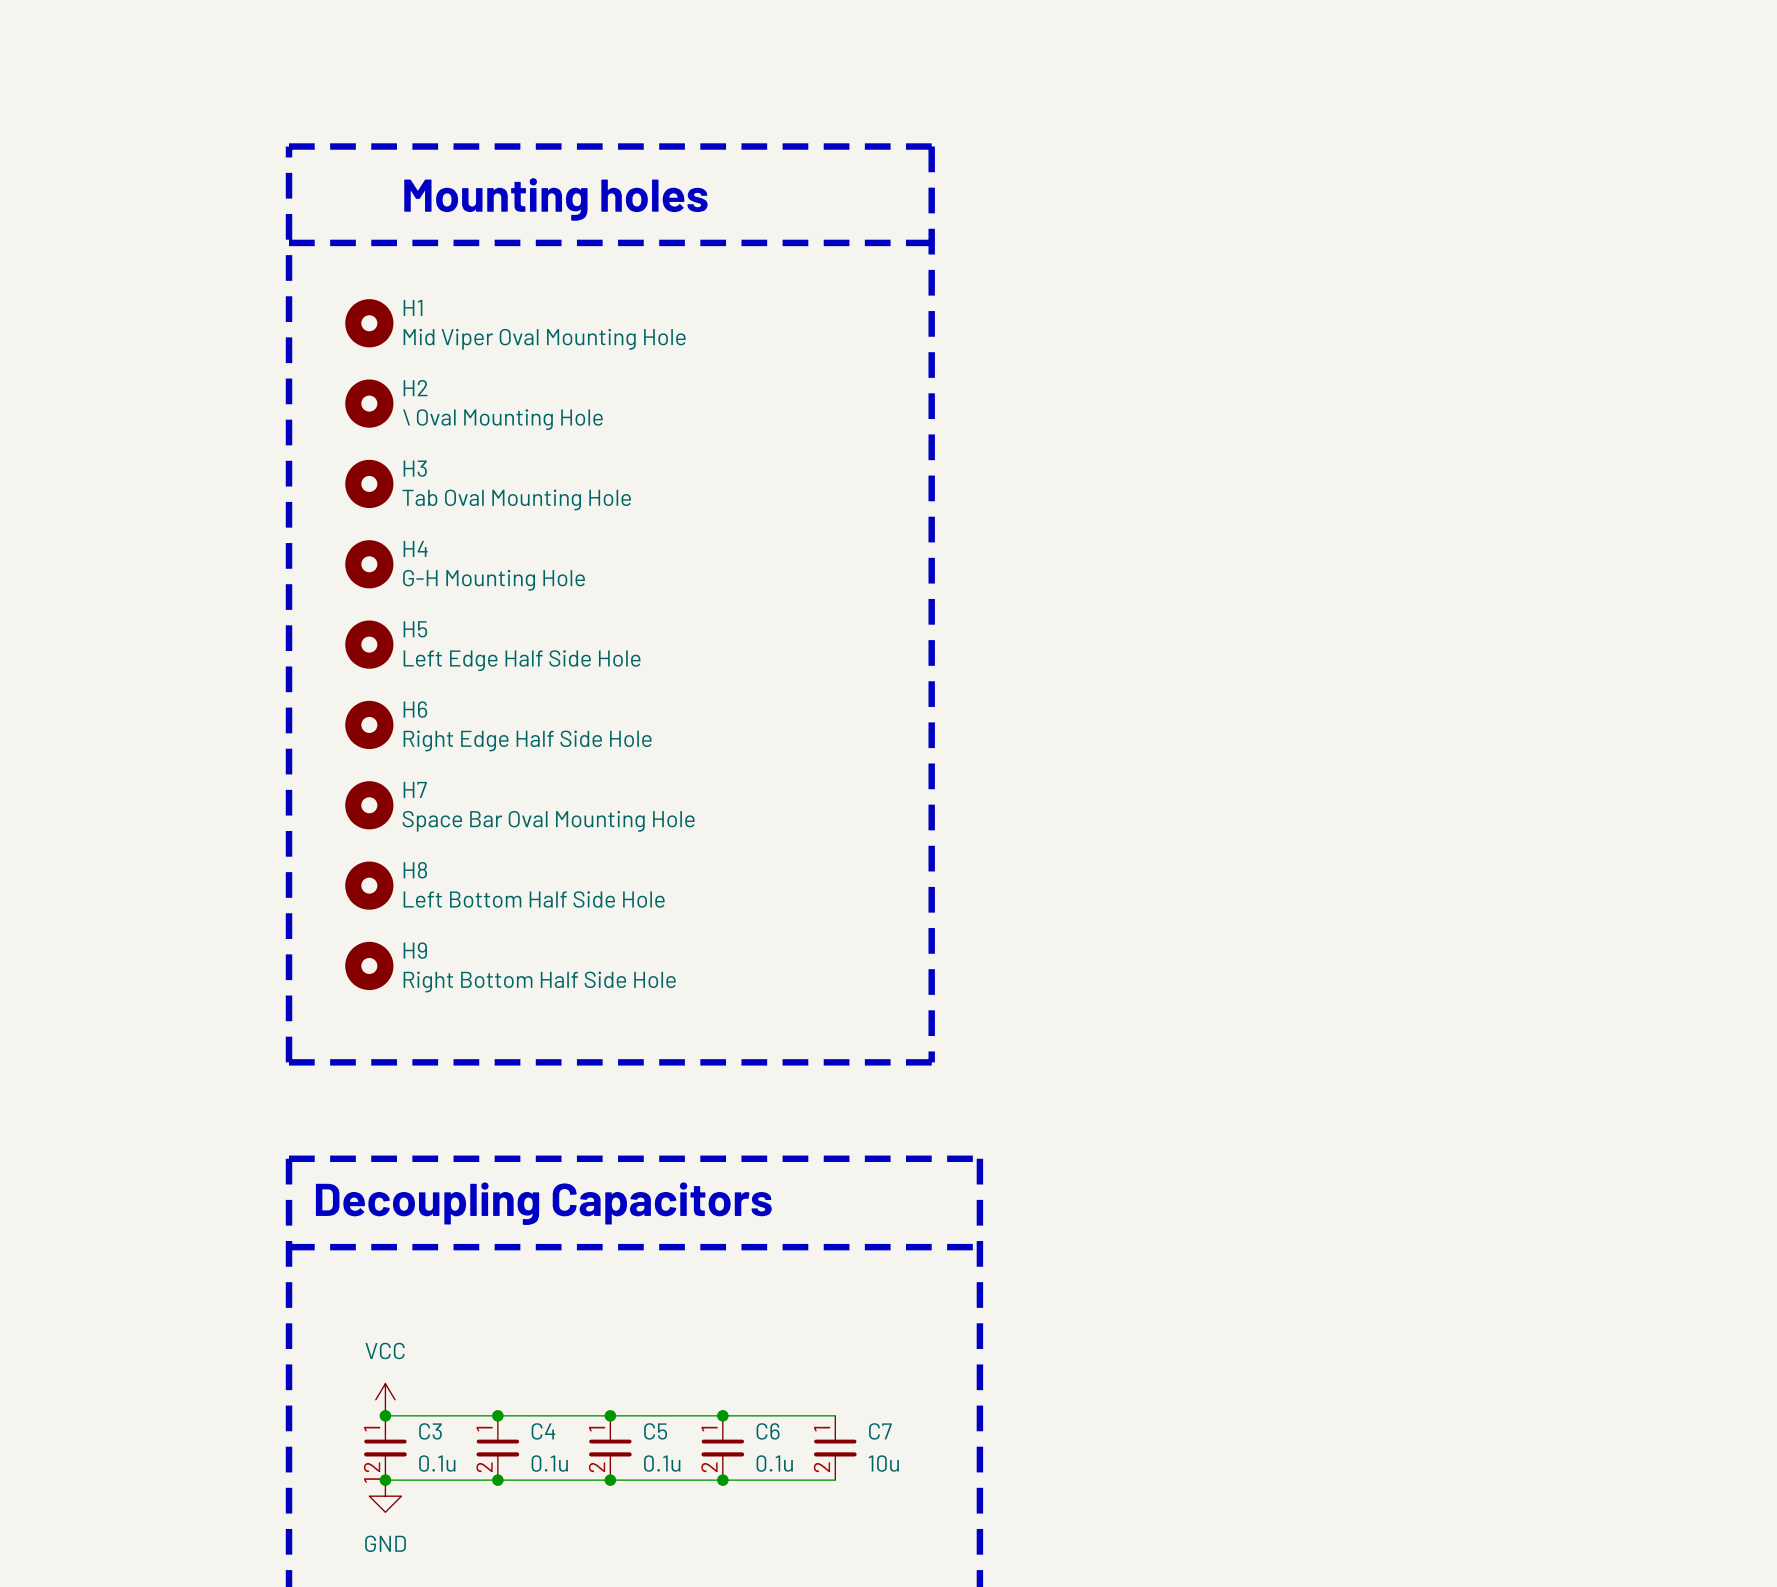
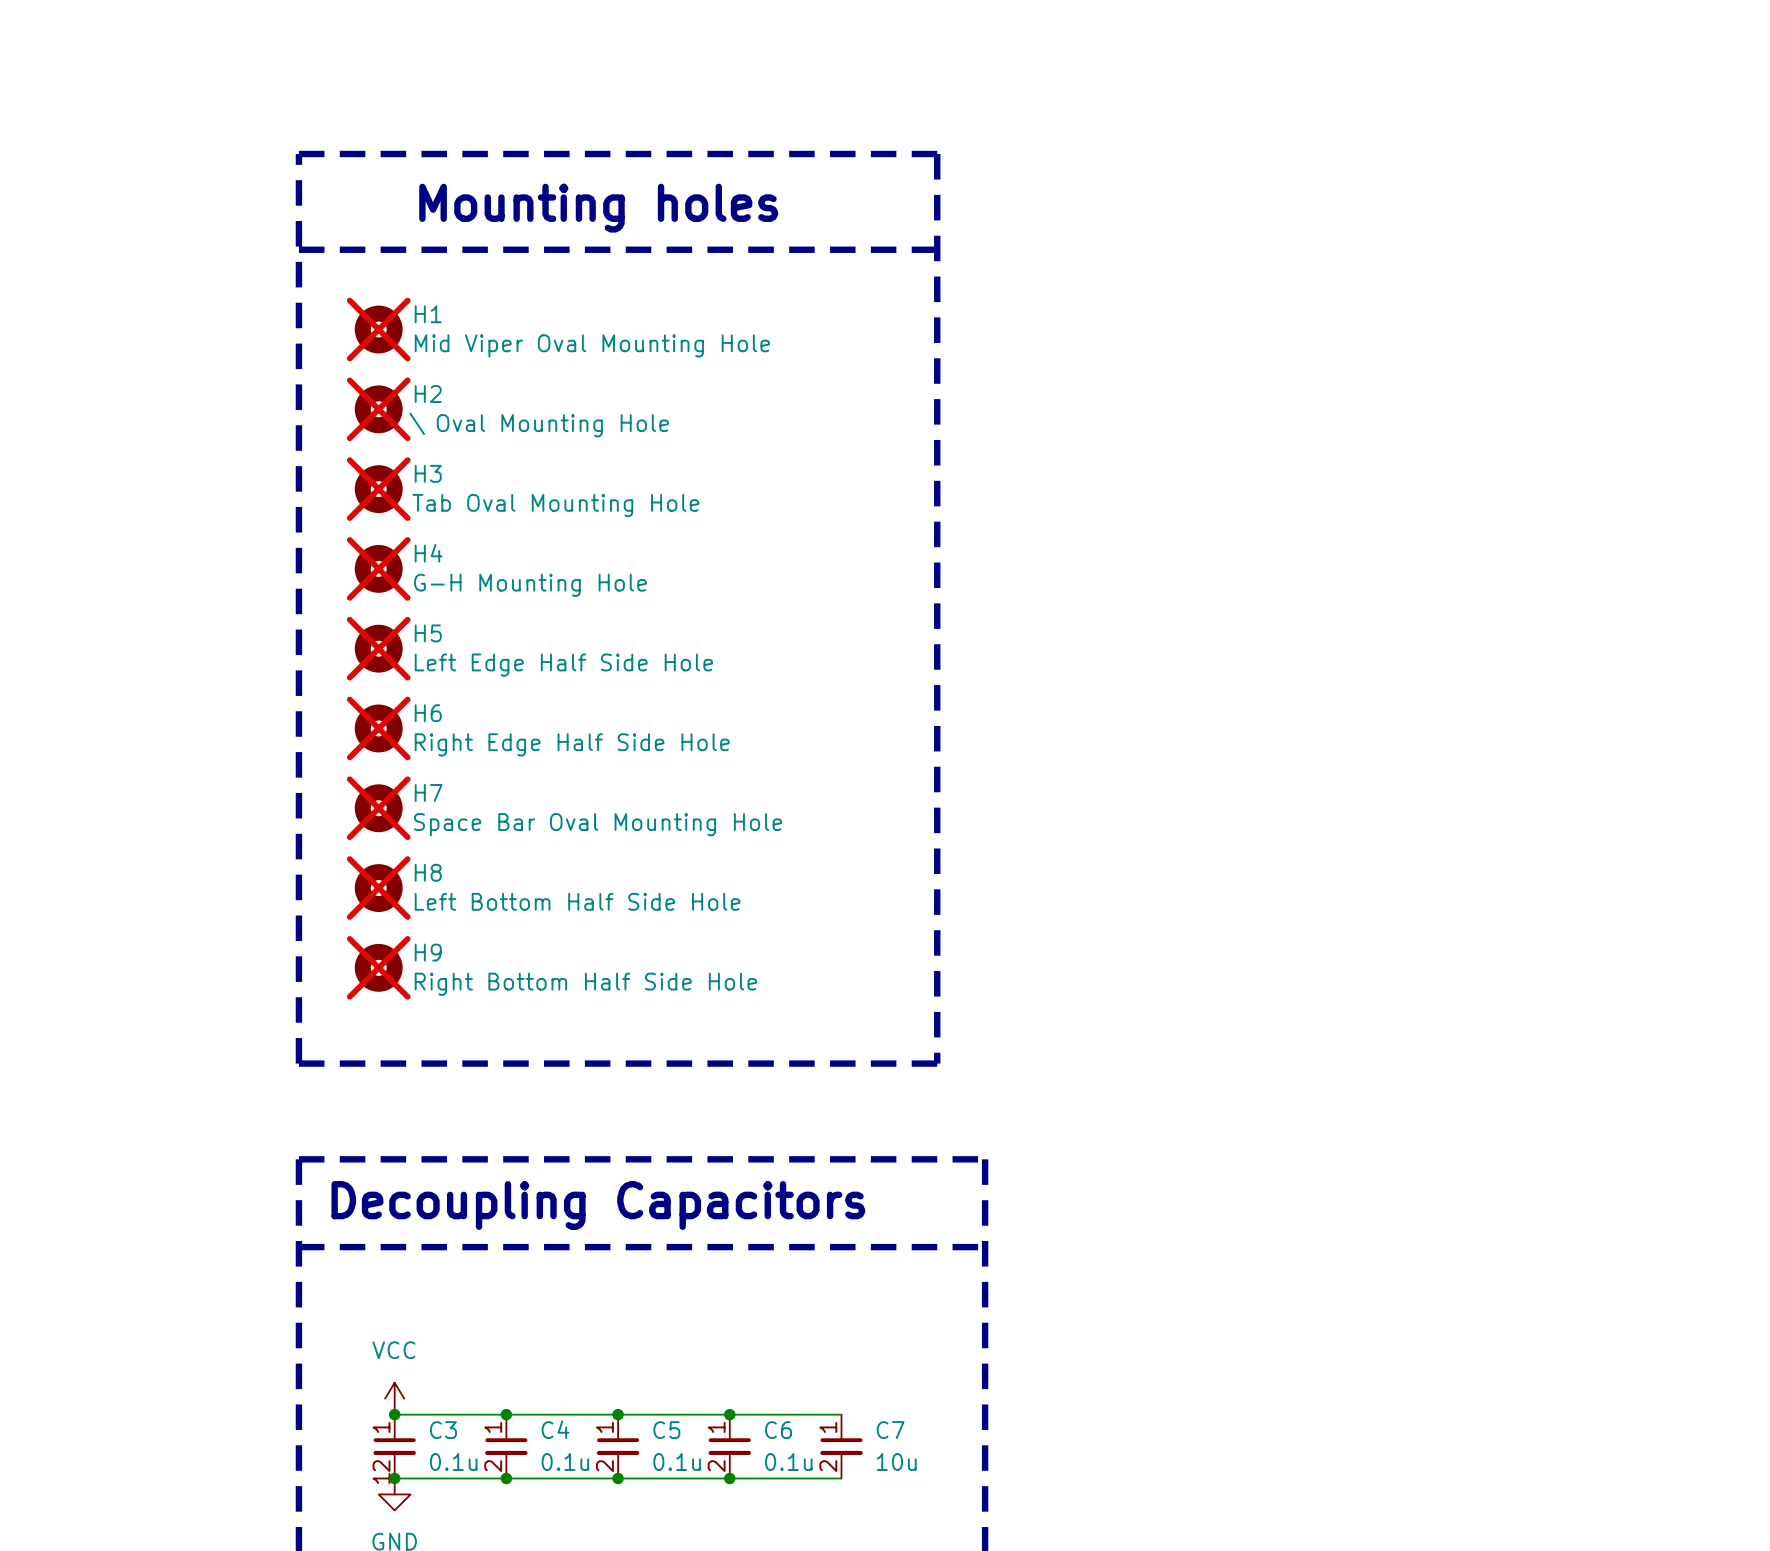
H1 do-not-place cross: none -> (378, 329)
H2 do-not-place cross: none -> (378, 409)
H3 do-not-place cross: none -> (378, 489)
H4 do-not-place cross: none -> (378, 568)
H5 do-not-place cross: none -> (378, 648)
H6 do-not-place cross: none -> (378, 728)
H7 do-not-place cross: none -> (378, 808)
H8 do-not-place cross: none -> (378, 888)
H9 do-not-place cross: none -> (378, 967)

